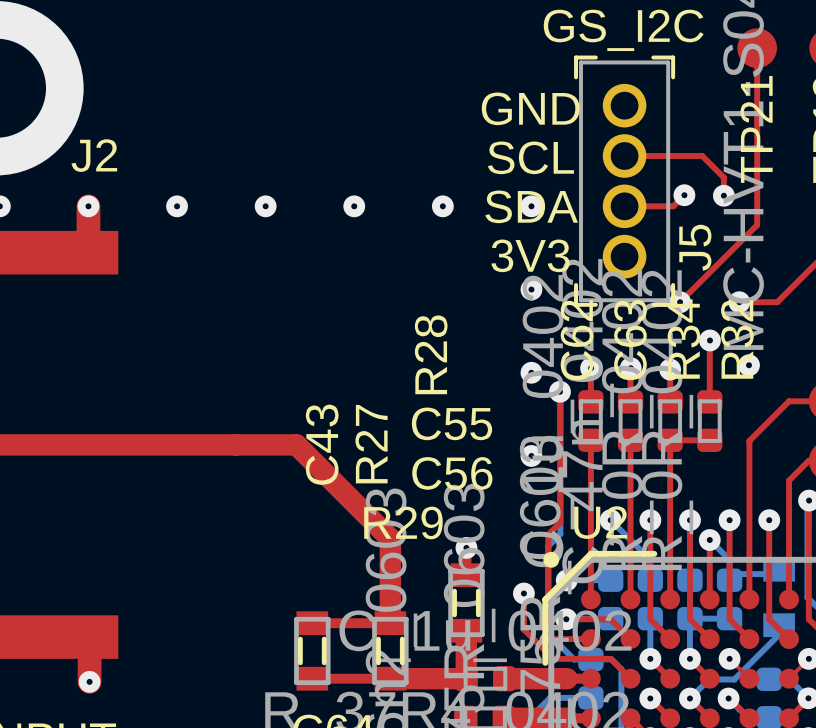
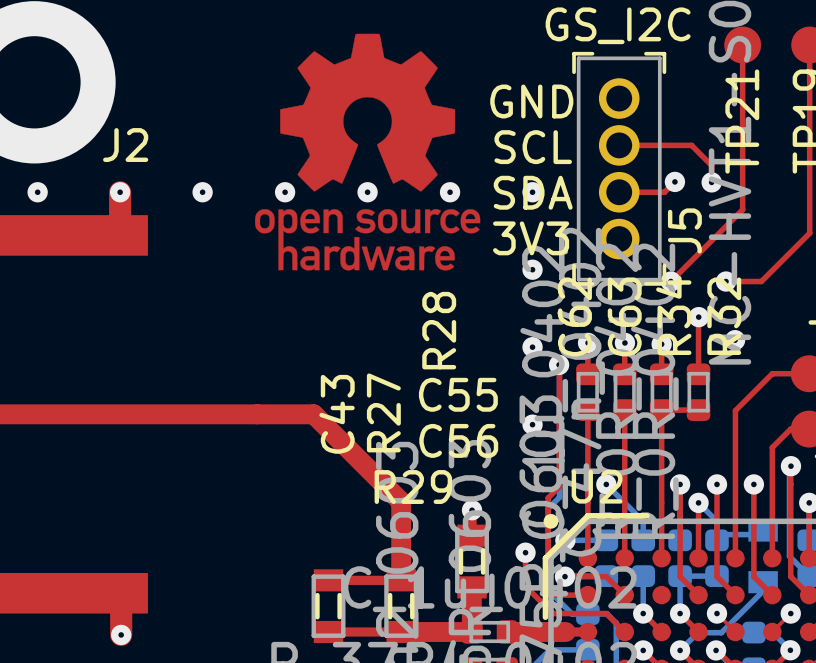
drawing: none -> [255, 33, 481, 271]
top track: (650, 520) (650, 619) (670, 639) -> none
via: (650, 520) -> none

